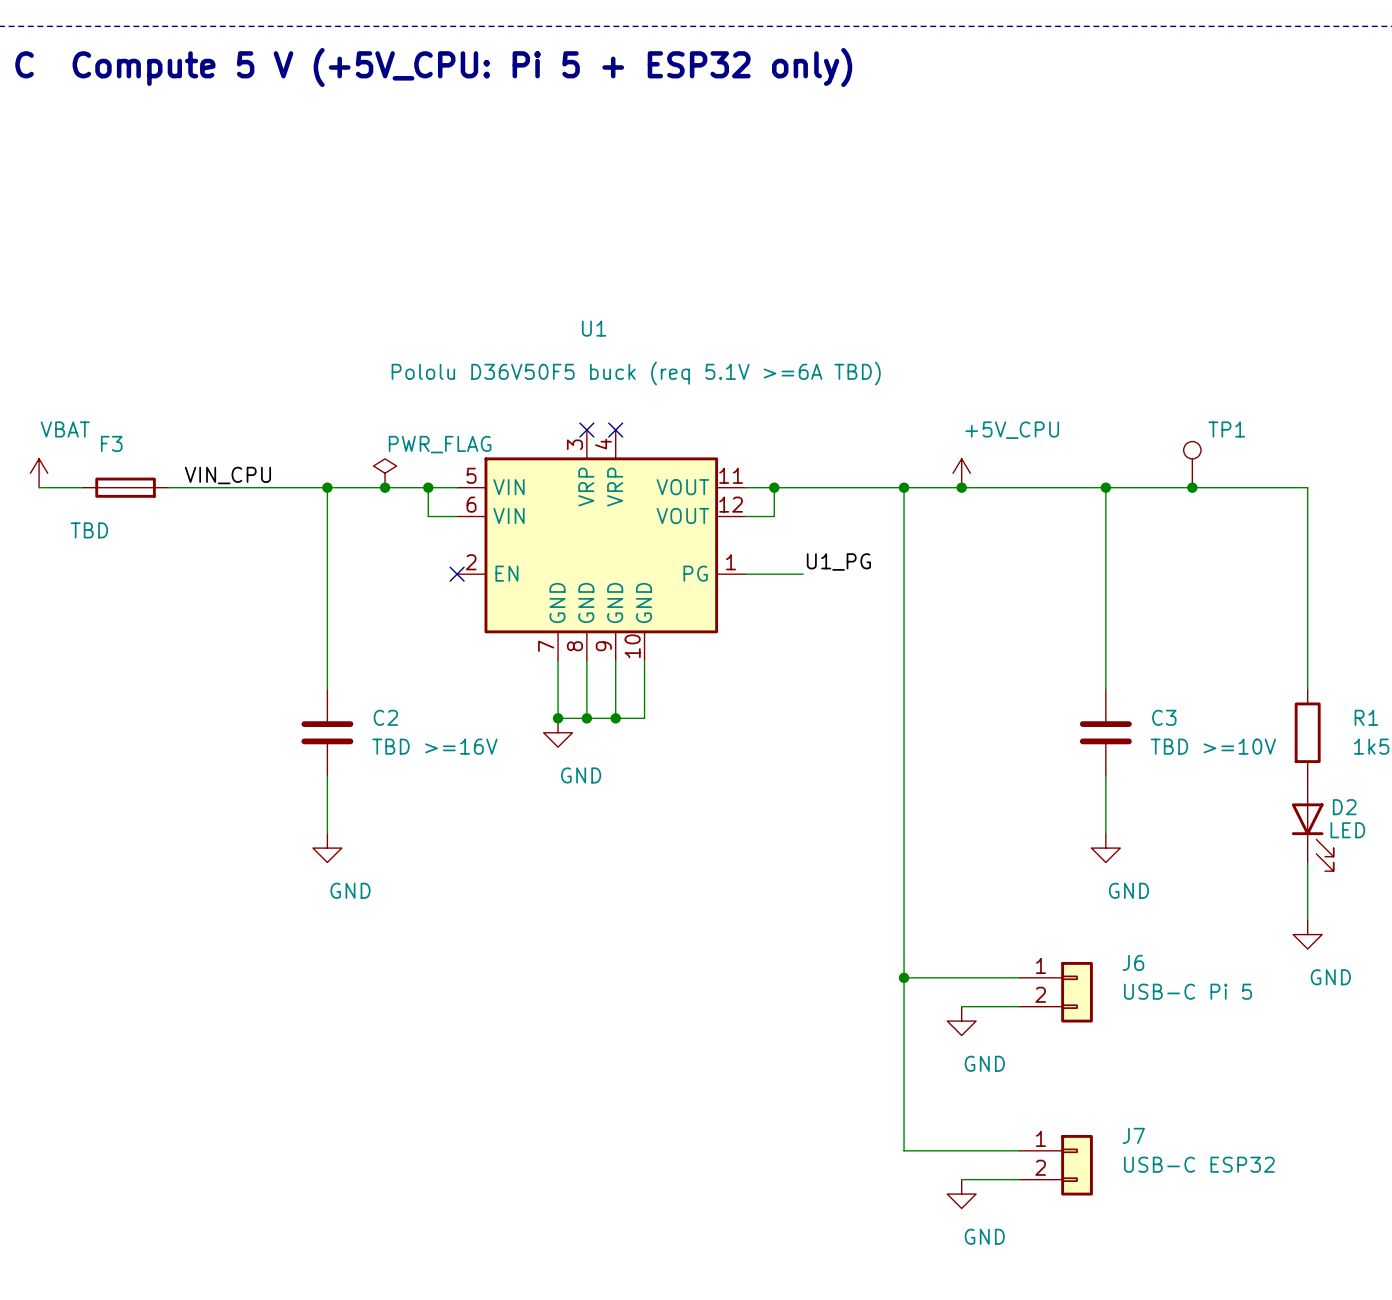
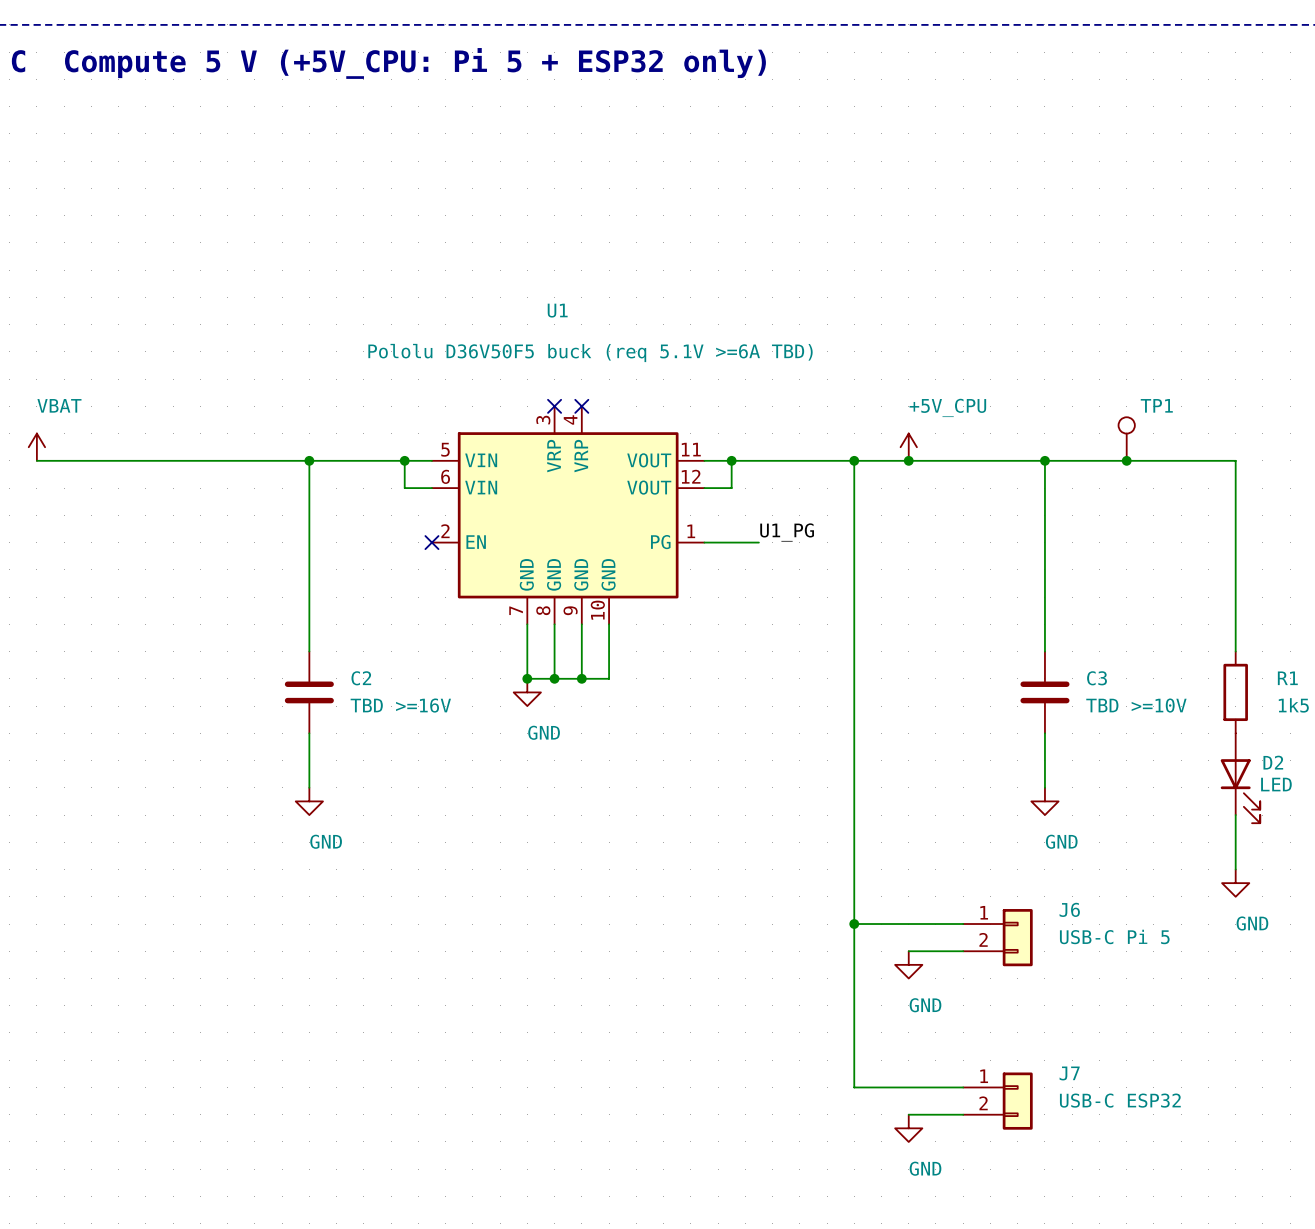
power symbol: PWR_FLAG (385, 473) -> none
label: VIN_CPU (227, 475) -> none
F3: TBD (125, 487) -> none
junction: (385, 487) -> none

